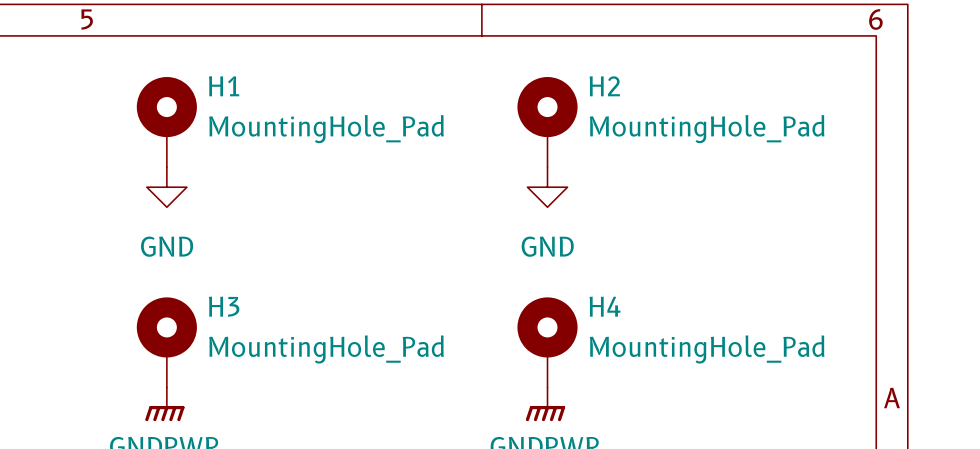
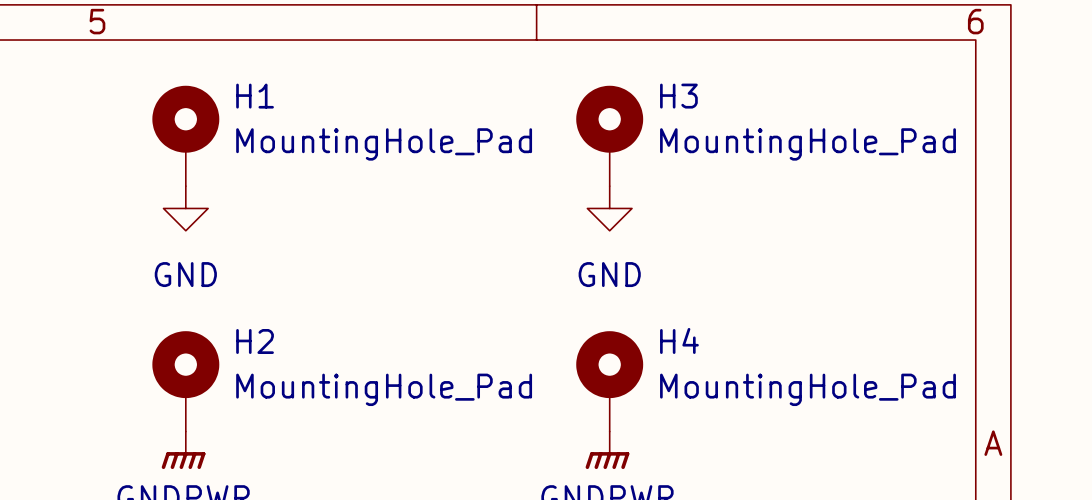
H2 name: H2 (604, 86) -> H3 (678, 96)
H3 name: H3 (224, 306) -> H2 (255, 341)

